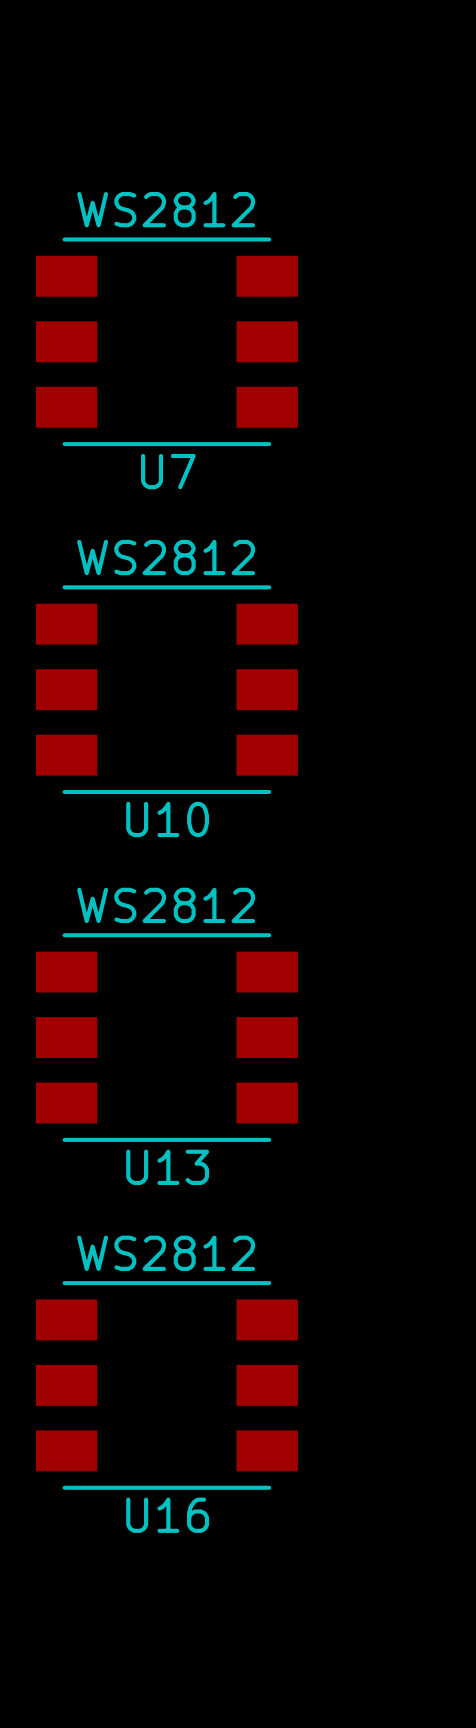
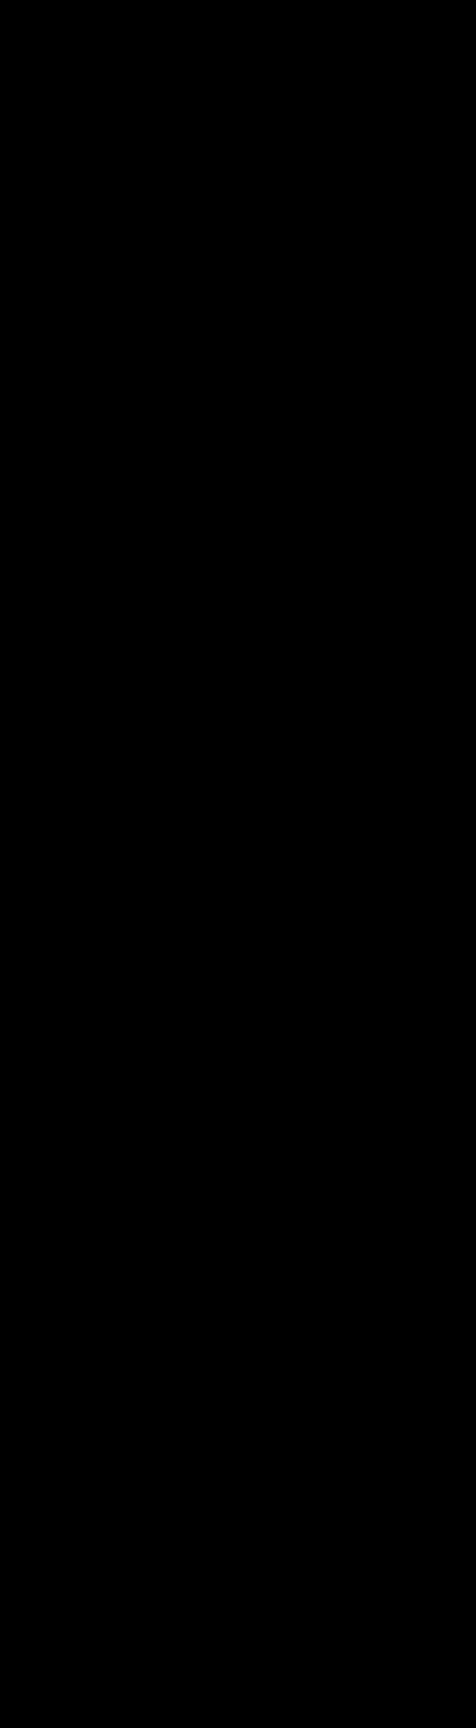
U7: WS2812 (166, 341) -> none
U10: WS2812 (166, 689) -> none
U13: WS2812 (166, 1037) -> none
U16: WS2812 (166, 1385) -> none

